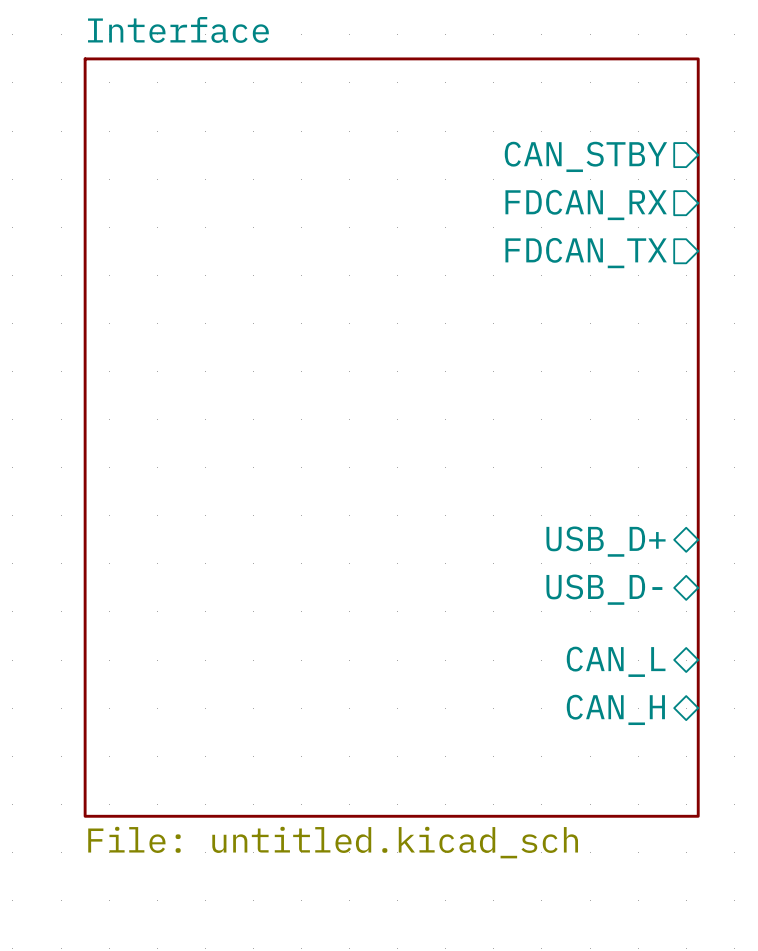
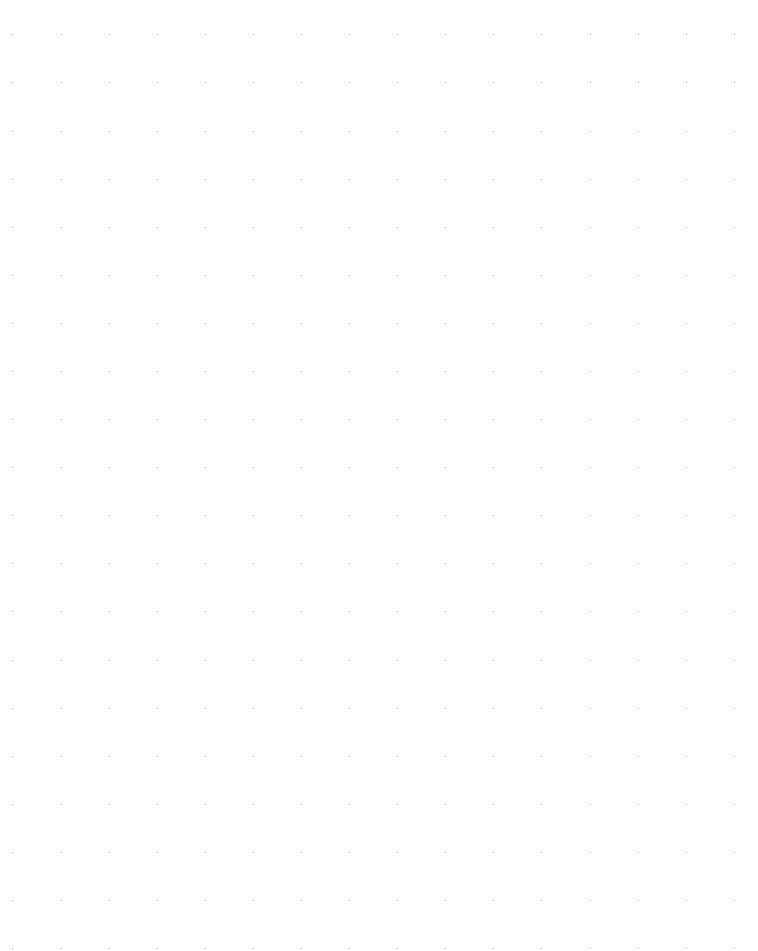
sheet pin: CAN_STBY (585, 156) -> none
sheet pin: FDCAN_RX (586, 204) -> none
sheet pin: FDCAN_TX (586, 253) -> none
sheet Interface: File: untitled.kicad_sch (391, 437) -> none
sheet pin: USB_D+ (606, 541) -> none
sheet pin: USB_D- (604, 589) -> none
sheet pin: CAN_L (616, 661) -> none
sheet pin: CAN_H (615, 709) -> none

